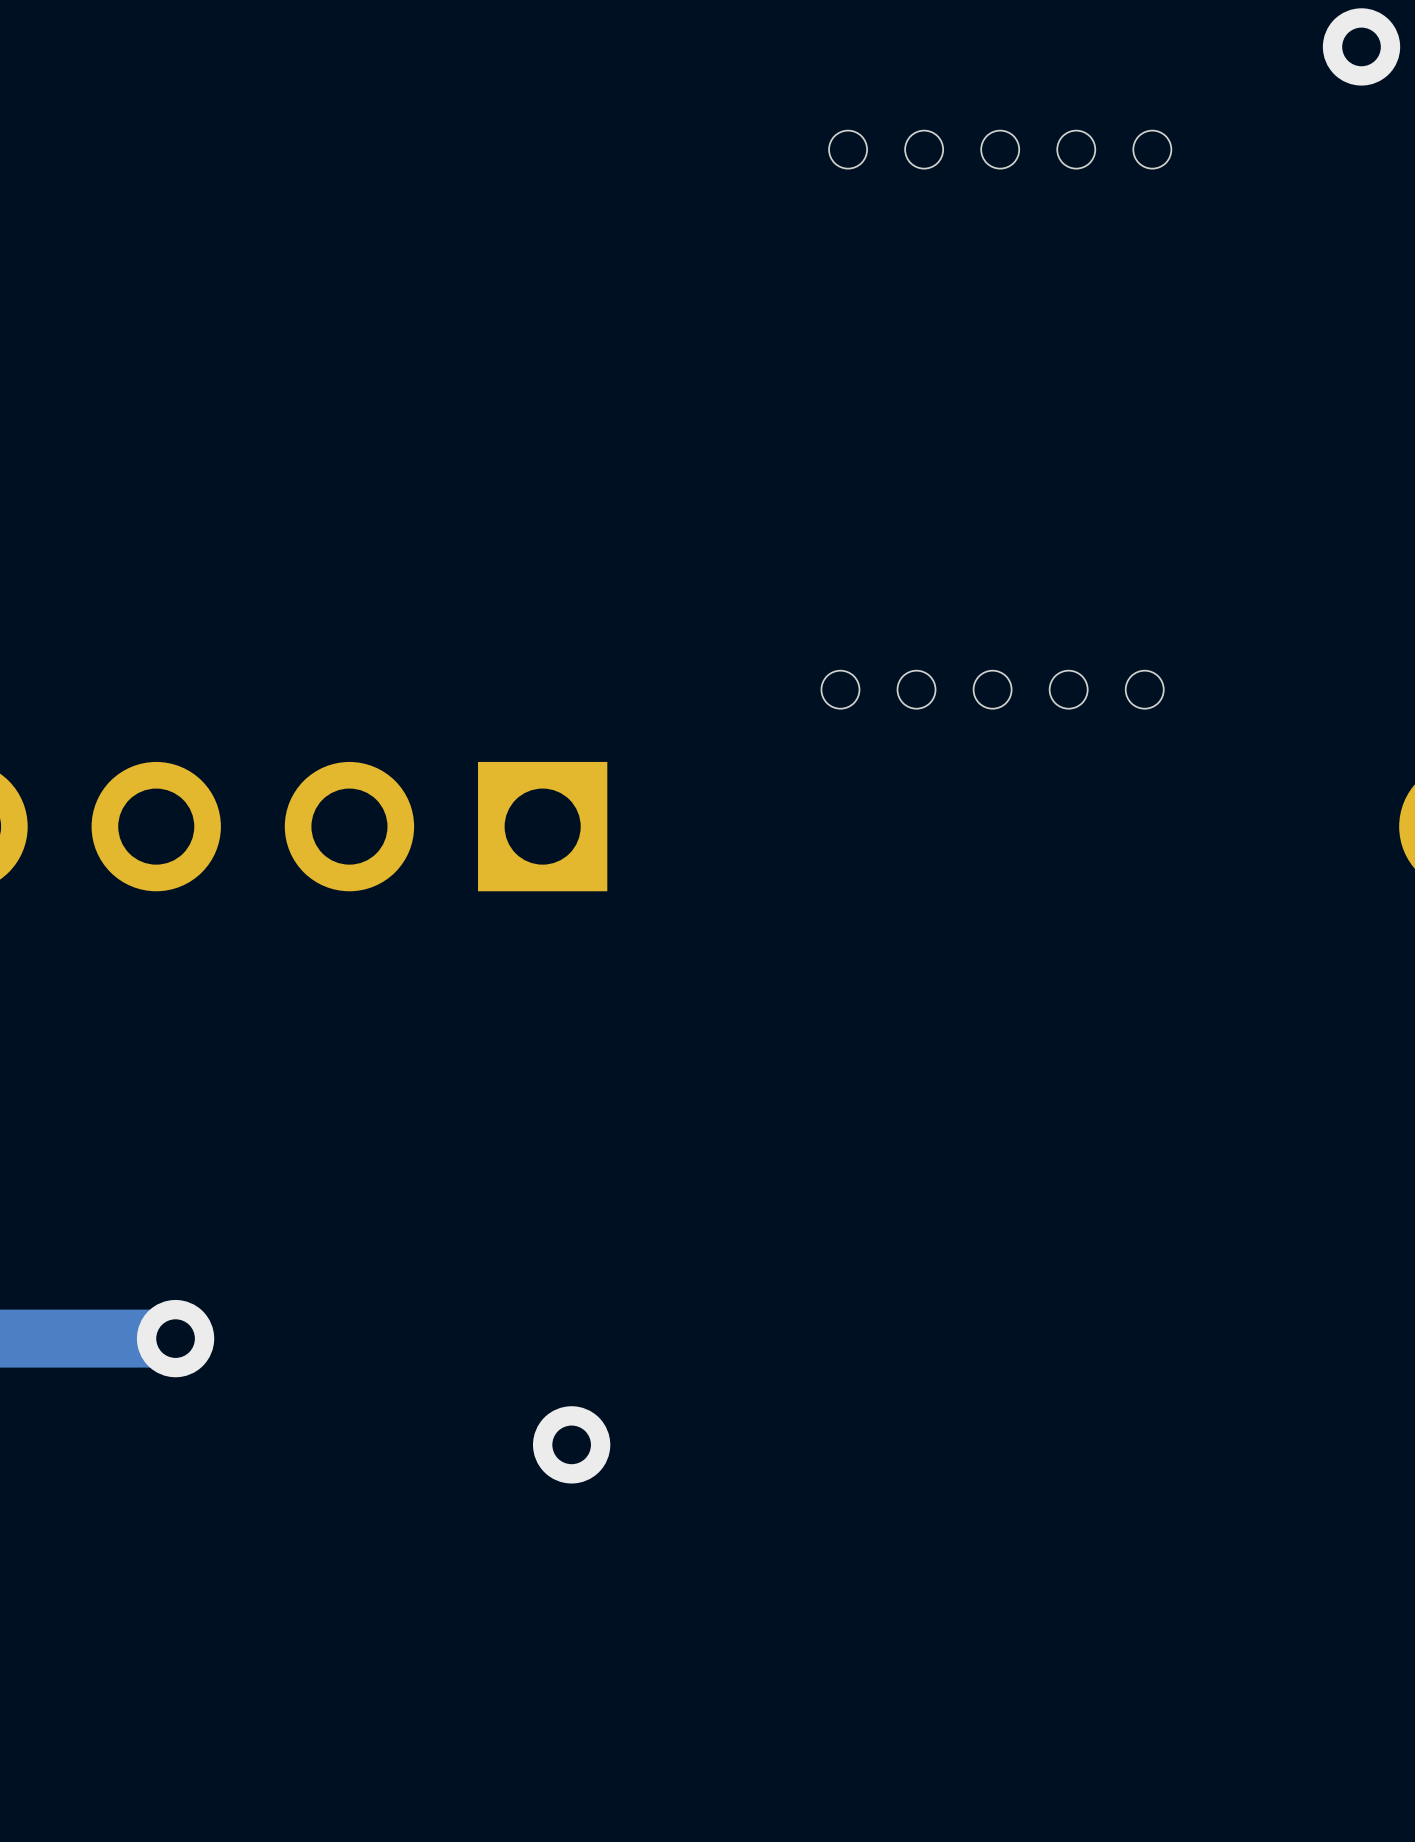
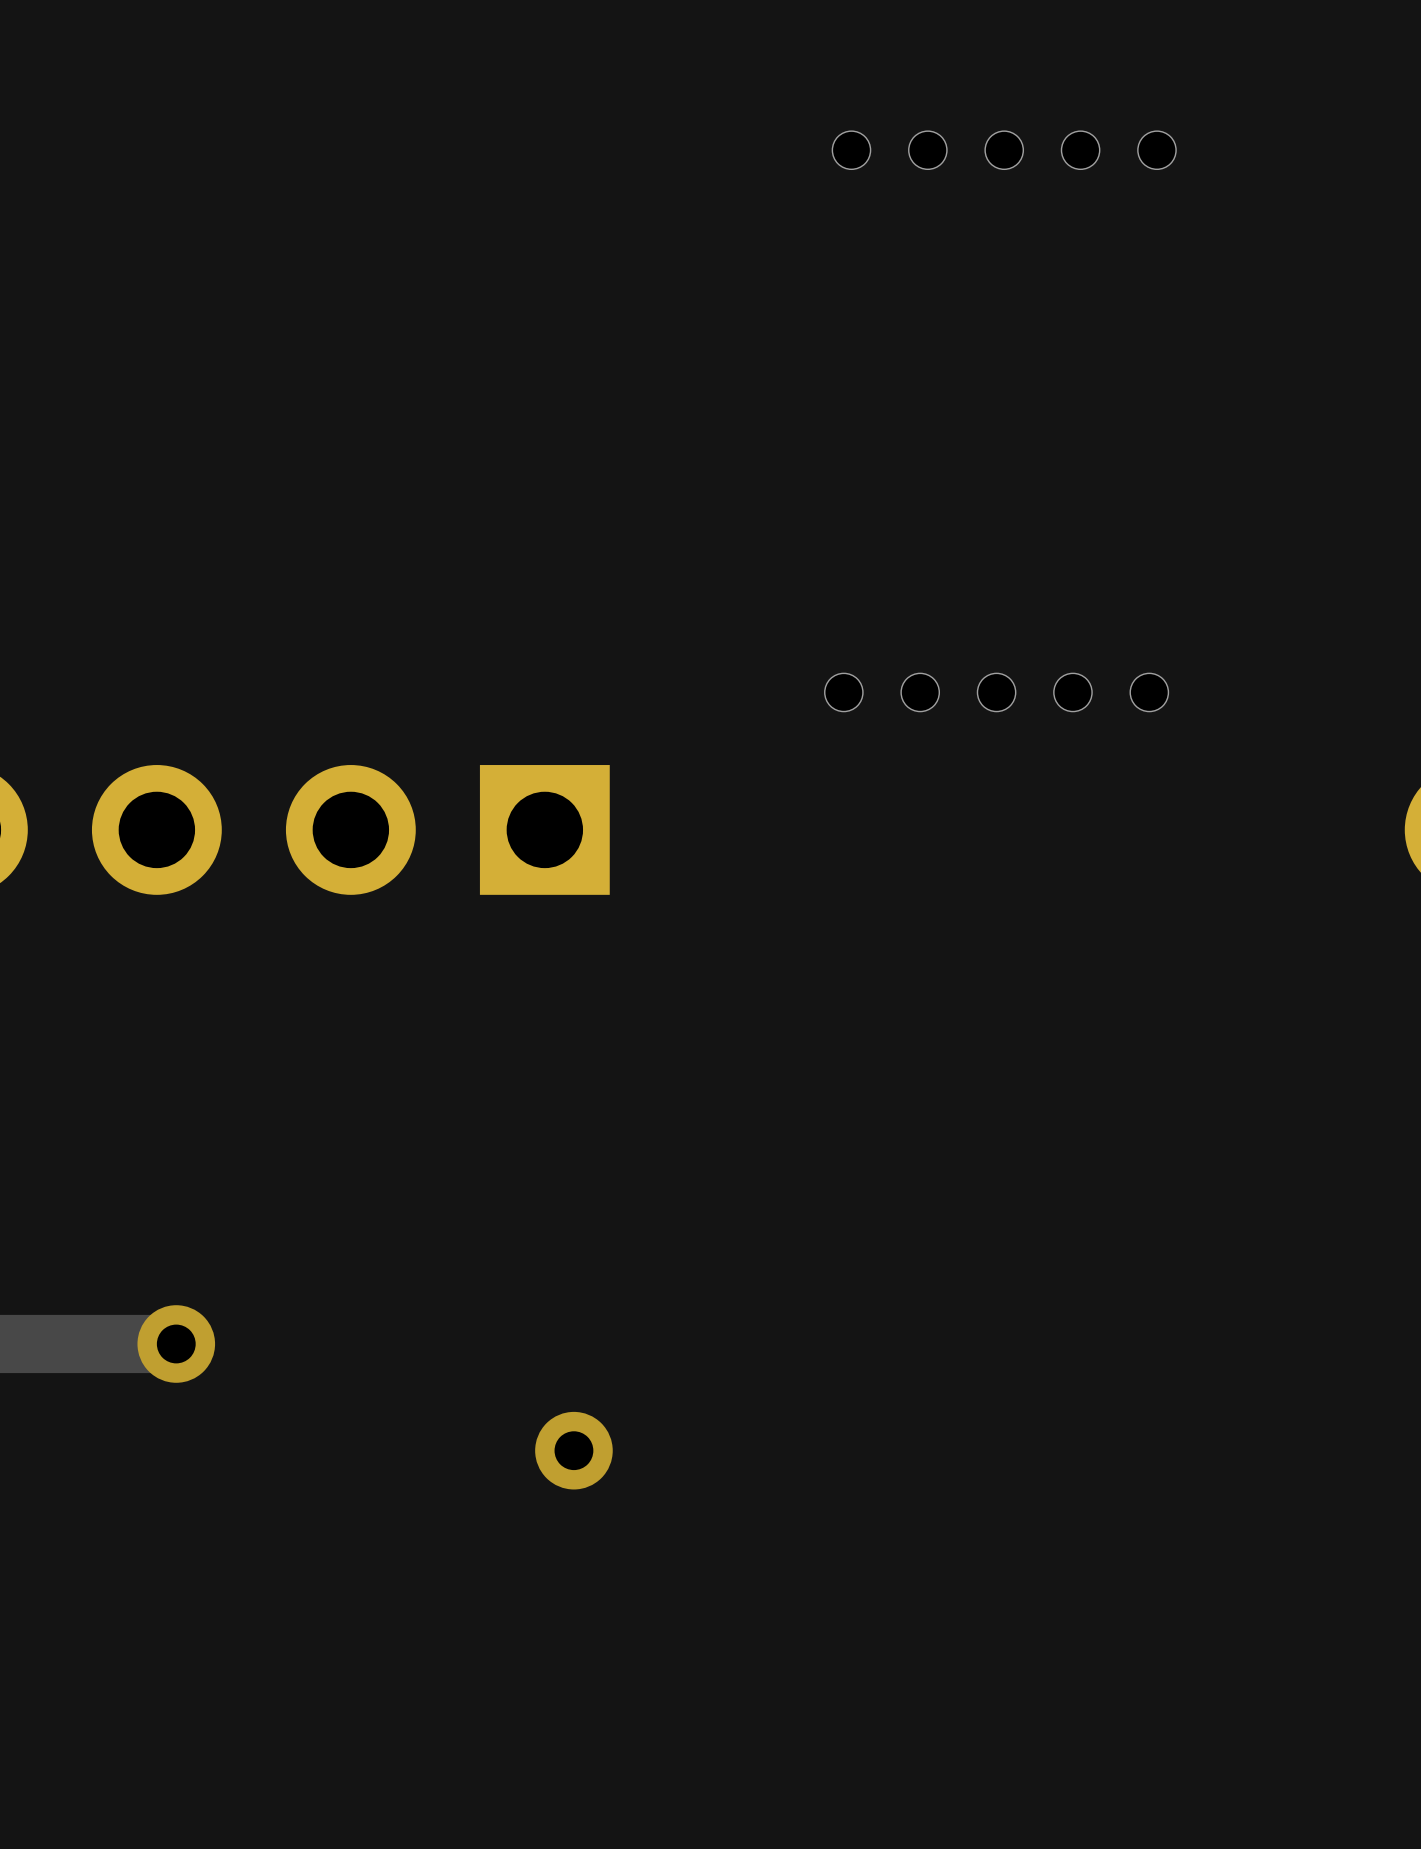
via: (1361, 46) -> none

